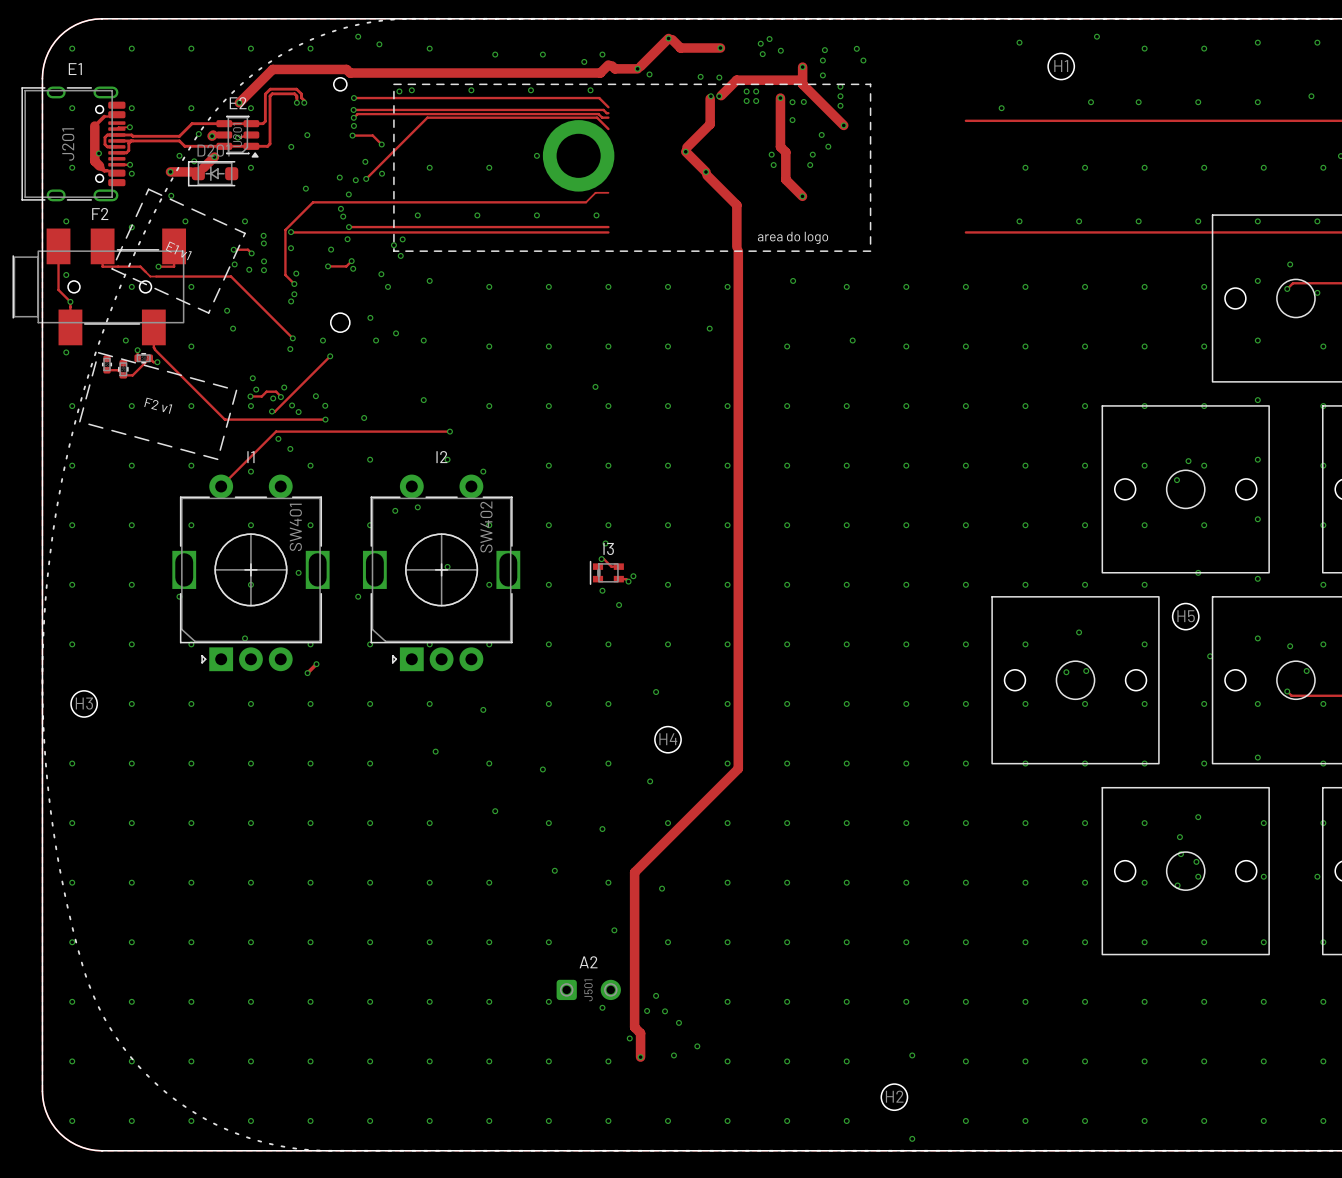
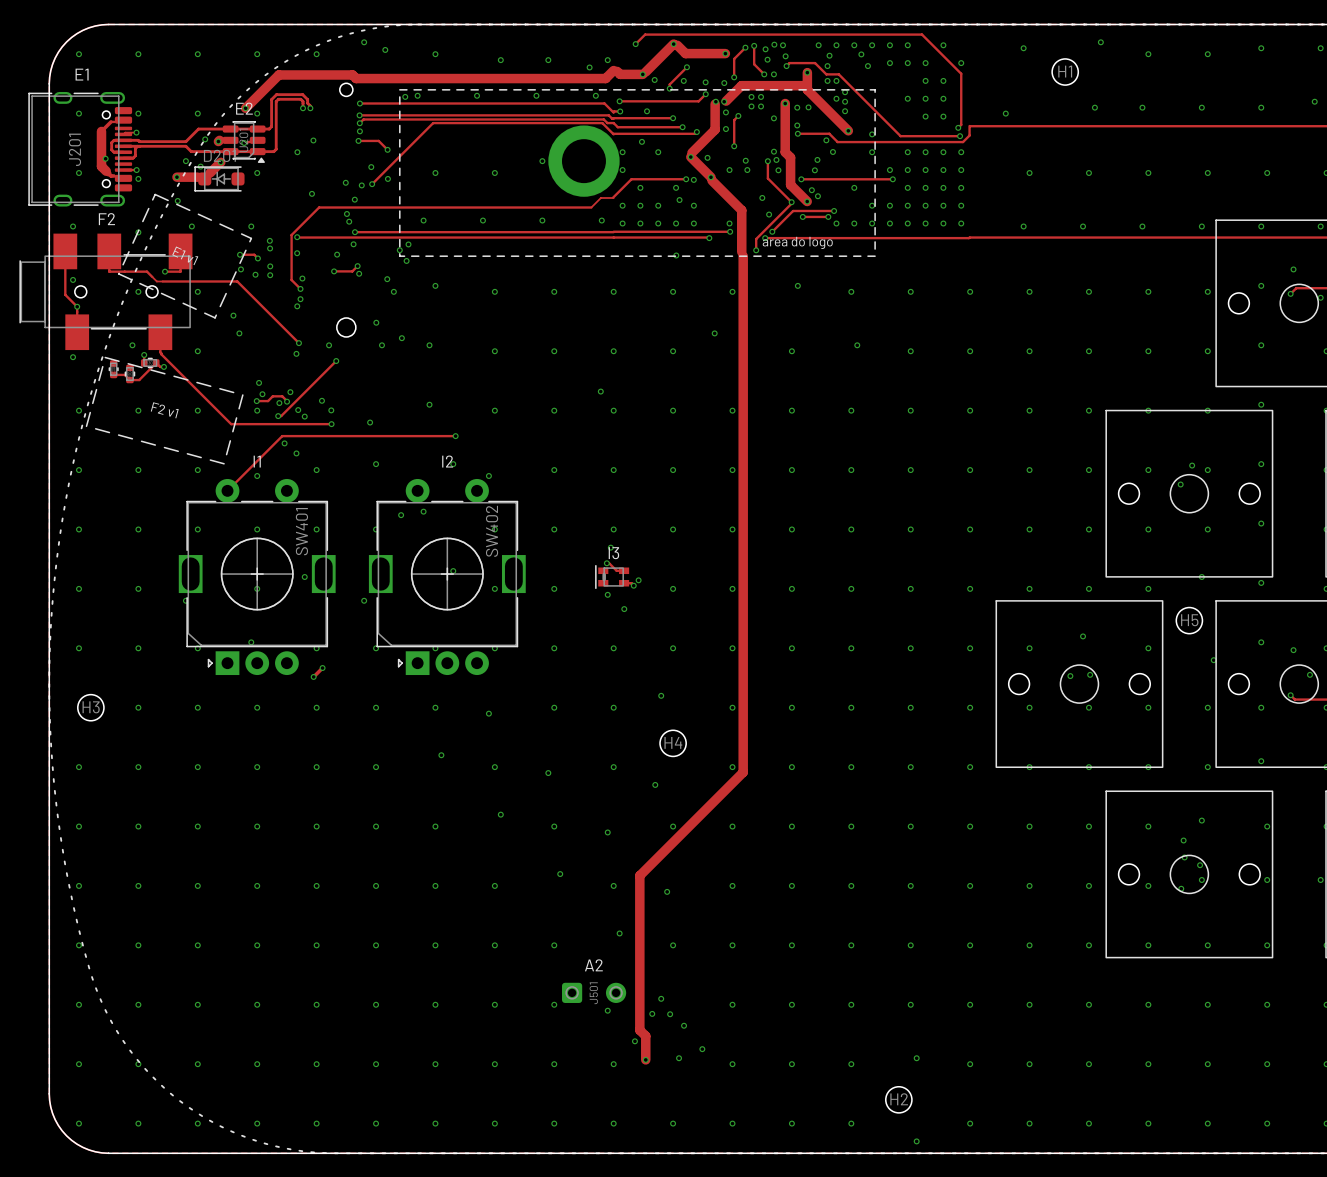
track: none -> (635, 44) (645, 34) (922, 34) (961, 73) (961, 124) (958, 127)
via: none -> (635, 44)
via: none -> (783, 45)
via: none -> (818, 45)
via: none -> (836, 45)
via: none -> (854, 45)
via: none -> (872, 45)
via: none -> (889, 45)
via: none -> (907, 45)
via: none -> (943, 45)
track: none -> (754, 45) (754, 64) (764, 74)
via: none -> (754, 45)
track: none -> (745, 47) (734, 58) (734, 77)
via: none -> (745, 47)
via: none -> (889, 63)
via: none -> (907, 63)
via: none -> (925, 63)
via: none -> (961, 63)
track: none -> (786, 66) (789, 63) (815, 63) (826, 74) (838, 74) (900, 136) (960, 136)
via: none -> (786, 66)
track: none -> (686, 67) (669, 84) (669, 88)
via: none -> (686, 67)
via: none -> (764, 74)
via: none -> (773, 74)
via: none -> (734, 77)
via: none -> (683, 80)
via: none -> (836, 80)
via: none -> (925, 80)
via: none -> (943, 80)
via: none -> (669, 88)
track: none -> (705, 94) (698, 101) (619, 101)
via: none -> (705, 94)
via: none -> (836, 98)
via: none -> (907, 98)
via: none -> (925, 98)
via: none -> (943, 98)
via: none -> (619, 101)
via: none -> (647, 111)
track: none -> (620, 111) (613, 112)
via: none -> (620, 111)
via: none -> (725, 112)
track: none -> (738, 115) (734, 120) (734, 146)
via: none -> (738, 115)
via: none -> (925, 116)
via: none -> (943, 116)
track: none -> (613, 118) (673, 118)
via: none -> (673, 118)
via: none -> (773, 118)
track: none -> (613, 123) (617, 127) (682, 127)
track: none -> (969, 126) (969, 135) (963, 142) (837, 142) (829, 133) (797, 133)
via: none -> (682, 127)
via: none -> (958, 127)
via: none -> (725, 129)
track: none -> (696, 132) (695, 133) (613, 133)
via: none -> (696, 132)
via: none -> (797, 133)
via: none -> (872, 134)
via: none -> (960, 136)
via: none -> (641, 141)
via: none -> (734, 146)
via: none -> (622, 152)
via: none -> (658, 152)
via: none -> (773, 151)
via: none -> (872, 152)
via: none -> (907, 152)
via: none -> (925, 152)
via: none -> (943, 152)
via: none -> (961, 152)
via: none -> (707, 157)
via: none -> (745, 160)
track: none -> (767, 161) (767, 178) (791, 202)
via: none -> (767, 161)
via: none -> (622, 170)
via: none -> (729, 170)
via: none -> (747, 170)
via: none -> (889, 170)
via: none -> (907, 170)
via: none -> (925, 170)
via: none -> (943, 170)
via: none -> (961, 170)
track: none -> (686, 179) (631, 179) (613, 197)
via: none -> (686, 179)
via: none -> (693, 179)
track: none -> (801, 179) (892, 179)
via: none -> (801, 179)
via: none -> (892, 179)
via: none -> (640, 187)
via: none -> (676, 187)
via: none -> (854, 187)
via: none -> (907, 187)
via: none -> (925, 187)
via: none -> (943, 187)
via: none -> (961, 187)
via: none -> (811, 190)
via: none -> (817, 196)
via: none -> (762, 197)
via: none -> (679, 200)
via: none -> (791, 202)
track: none -> (790, 204) (756, 239) (756, 250)
via: none -> (622, 205)
via: none -> (640, 205)
via: none -> (658, 205)
via: none -> (693, 205)
via: none -> (872, 205)
via: none -> (889, 205)
via: none -> (907, 205)
via: none -> (925, 205)
via: none -> (943, 205)
via: none -> (961, 205)
track: none -> (834, 210) (793, 210) (772, 231)
via: none -> (834, 210)
via: none -> (769, 214)
track: none -> (802, 216) (828, 216)
via: none -> (802, 216)
via: none -> (828, 216)
via: none -> (622, 223)
via: none -> (640, 223)
via: none -> (658, 223)
via: none -> (676, 223)
via: none -> (693, 223)
via: none -> (729, 223)
via: none -> (836, 223)
via: none -> (854, 223)
via: none -> (872, 223)
via: none -> (889, 223)
via: none -> (907, 223)
via: none -> (925, 223)
via: none -> (943, 223)
via: none -> (961, 223)
track: none -> (613, 231) (730, 231)
via: none -> (730, 231)
via: none -> (772, 231)
track: none -> (613, 237) (709, 238)
track: none -> (969, 237) (765, 238)
via: none -> (709, 238)
via: none -> (765, 238)
via: none -> (756, 250)
via: none -> (676, 255)

